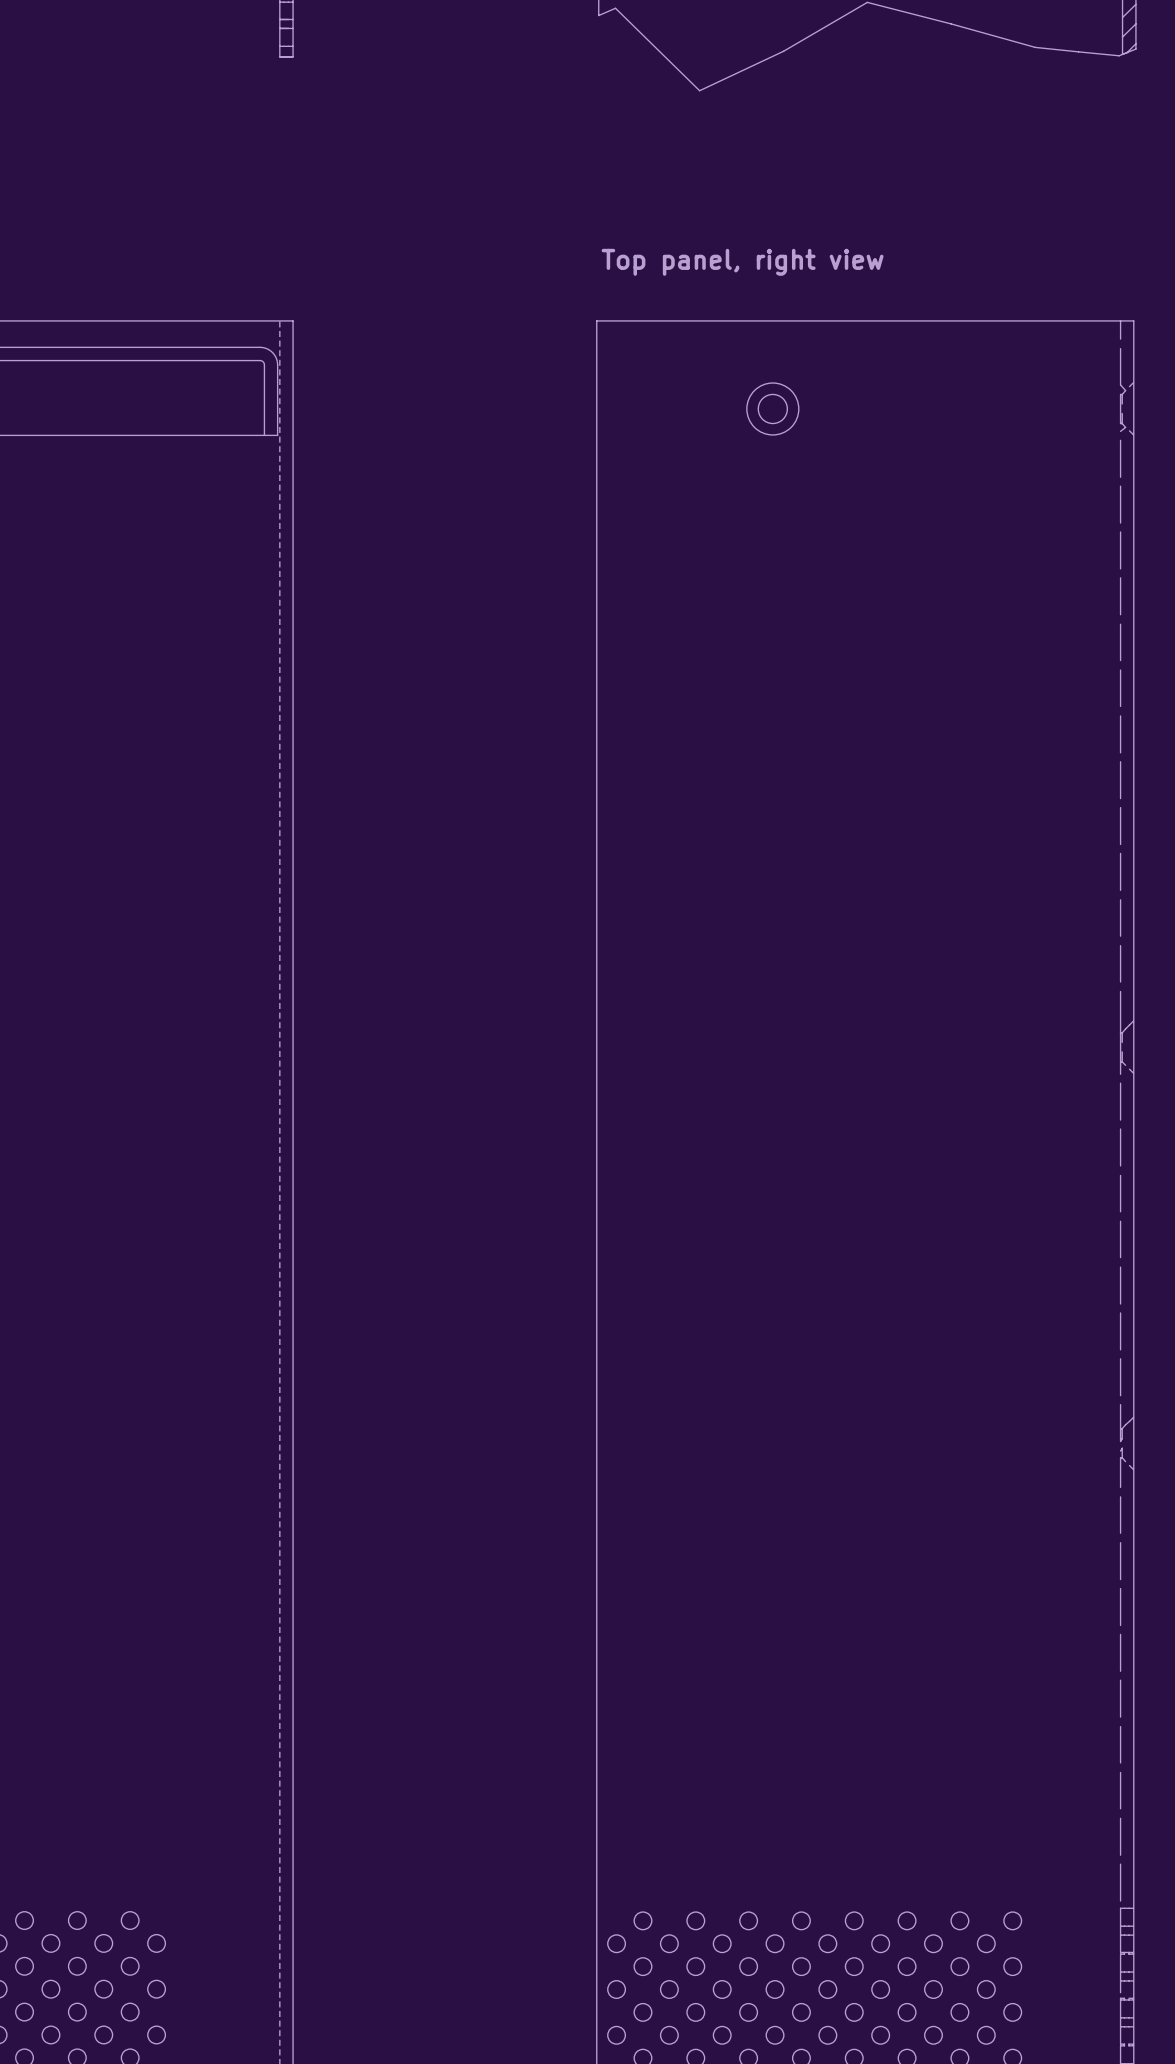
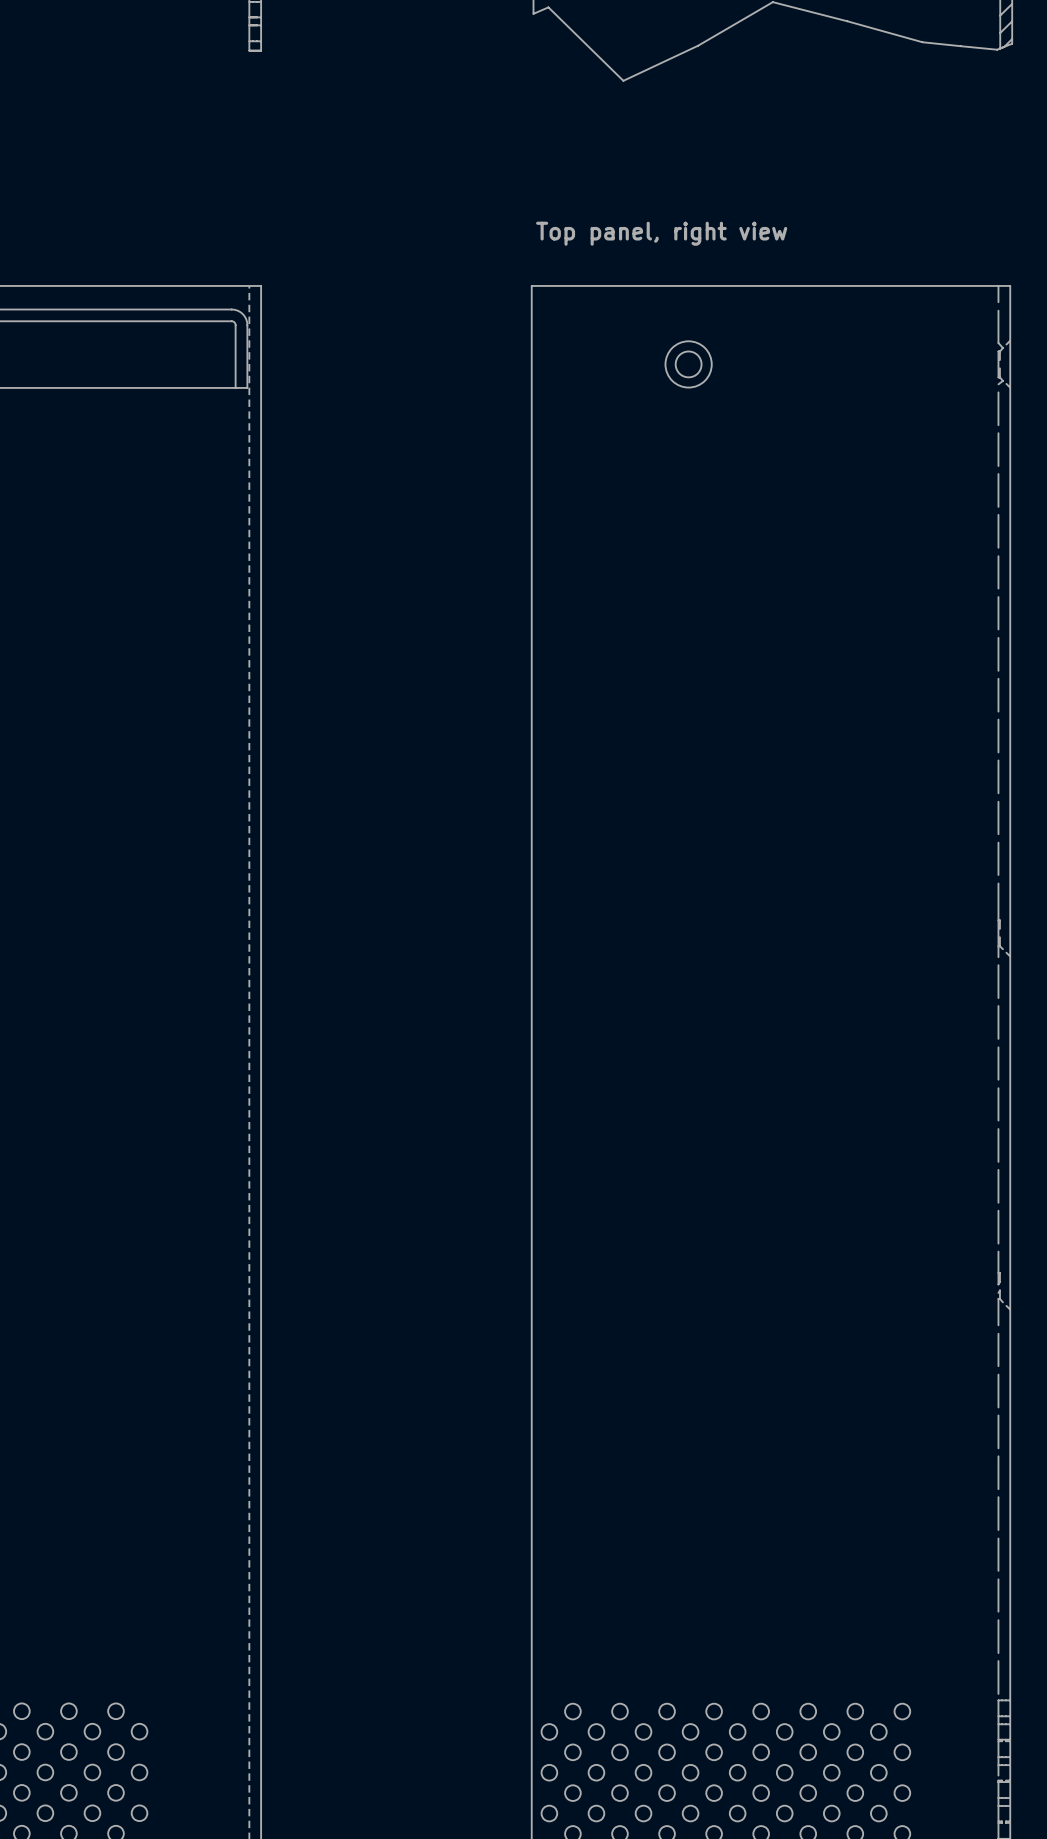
line: (1133, 1021) (1122, 1032) -> none
line: (1133, 1417) (1122, 1428) -> none

